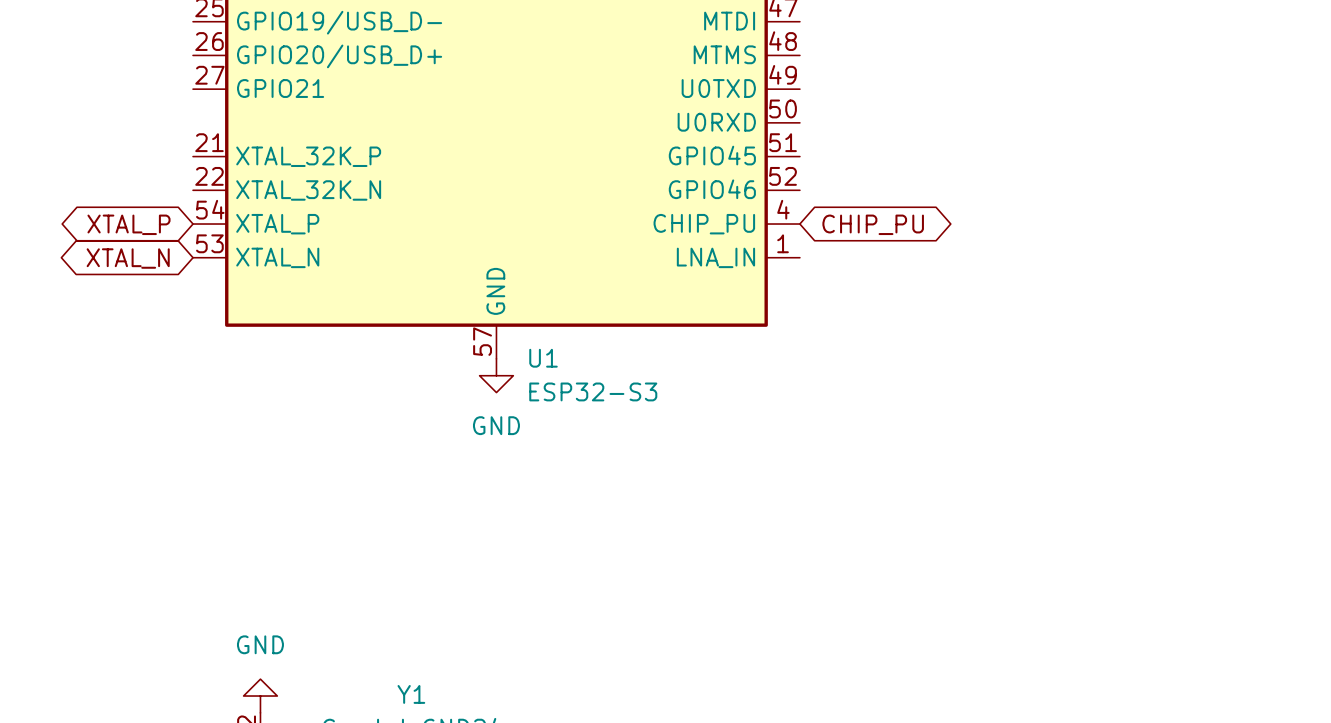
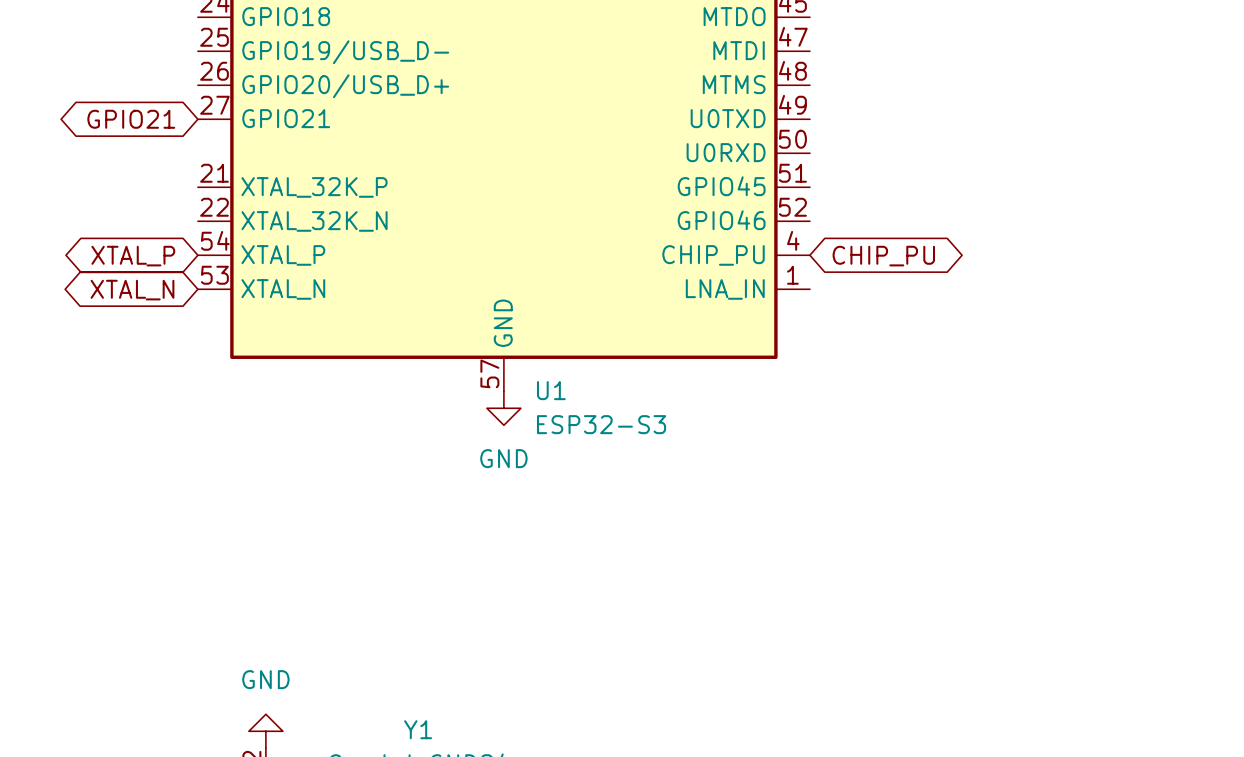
global label: none -> GPIO21 (131, 119)

